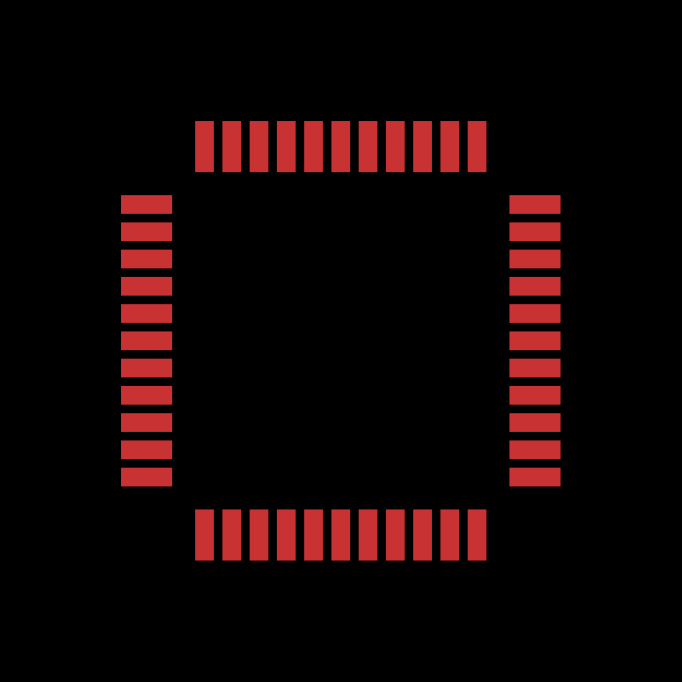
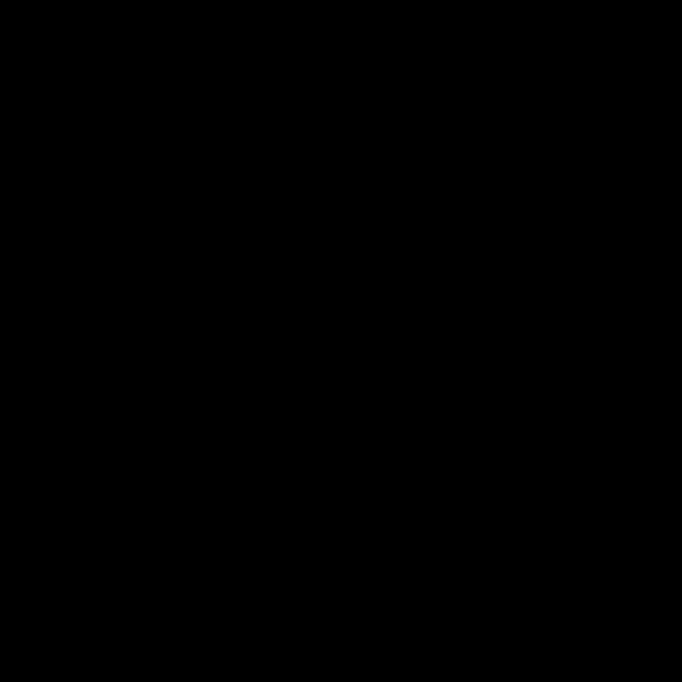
part: (340, 340) -> none

